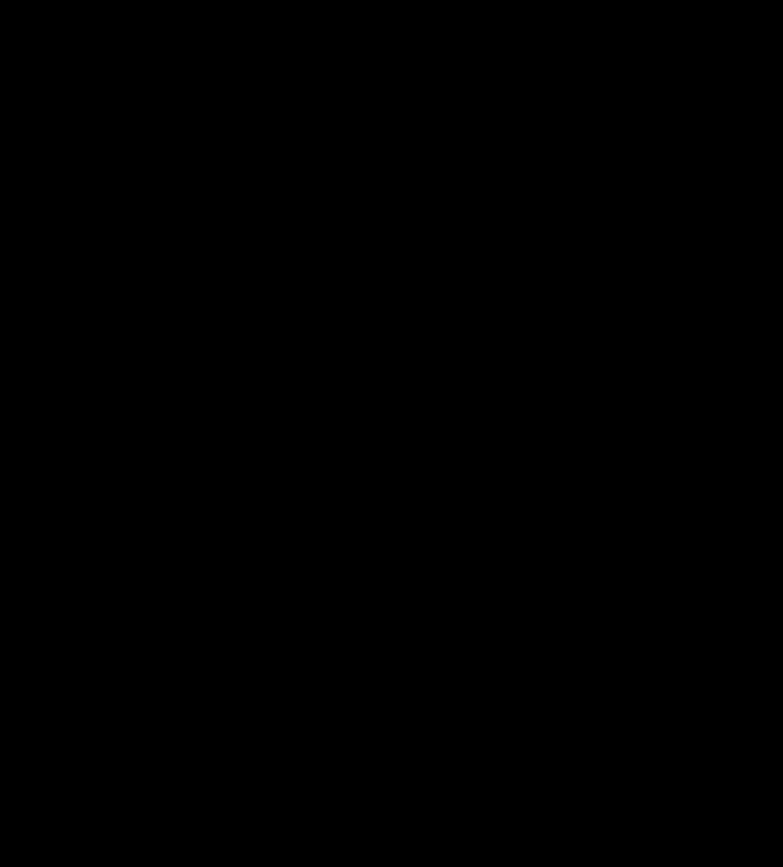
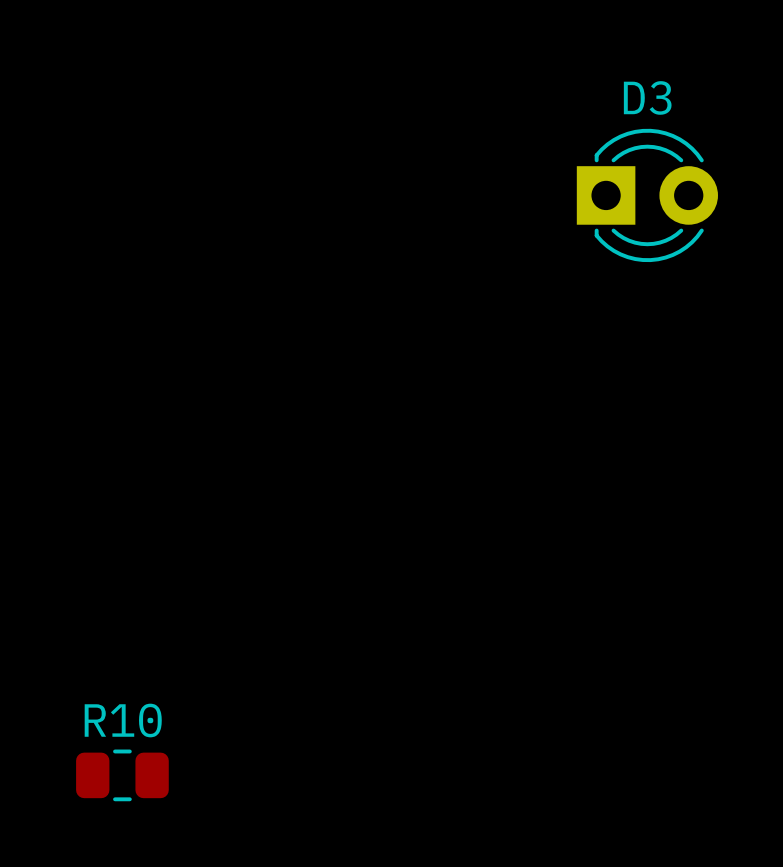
D3: none -> (647, 195)
R10: none -> (122, 775)

